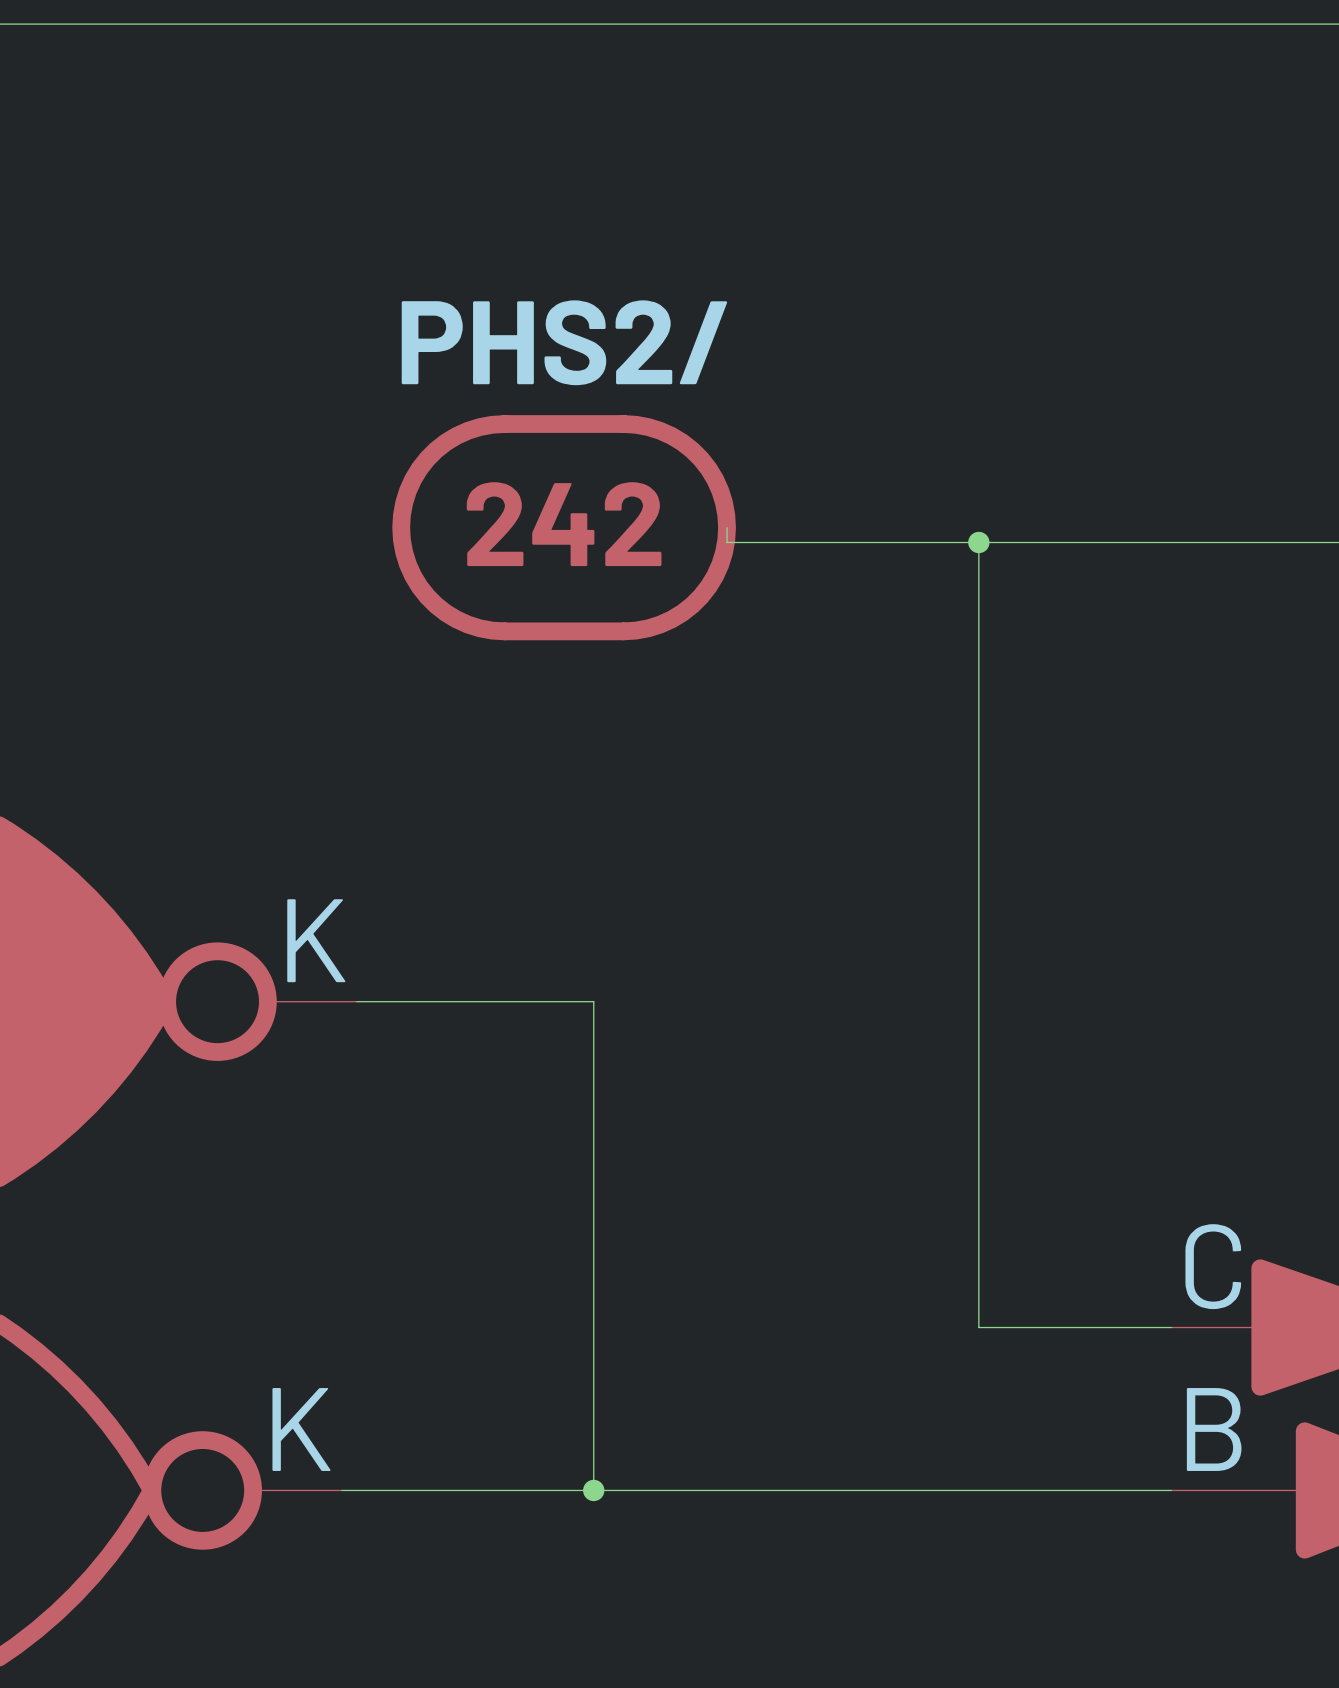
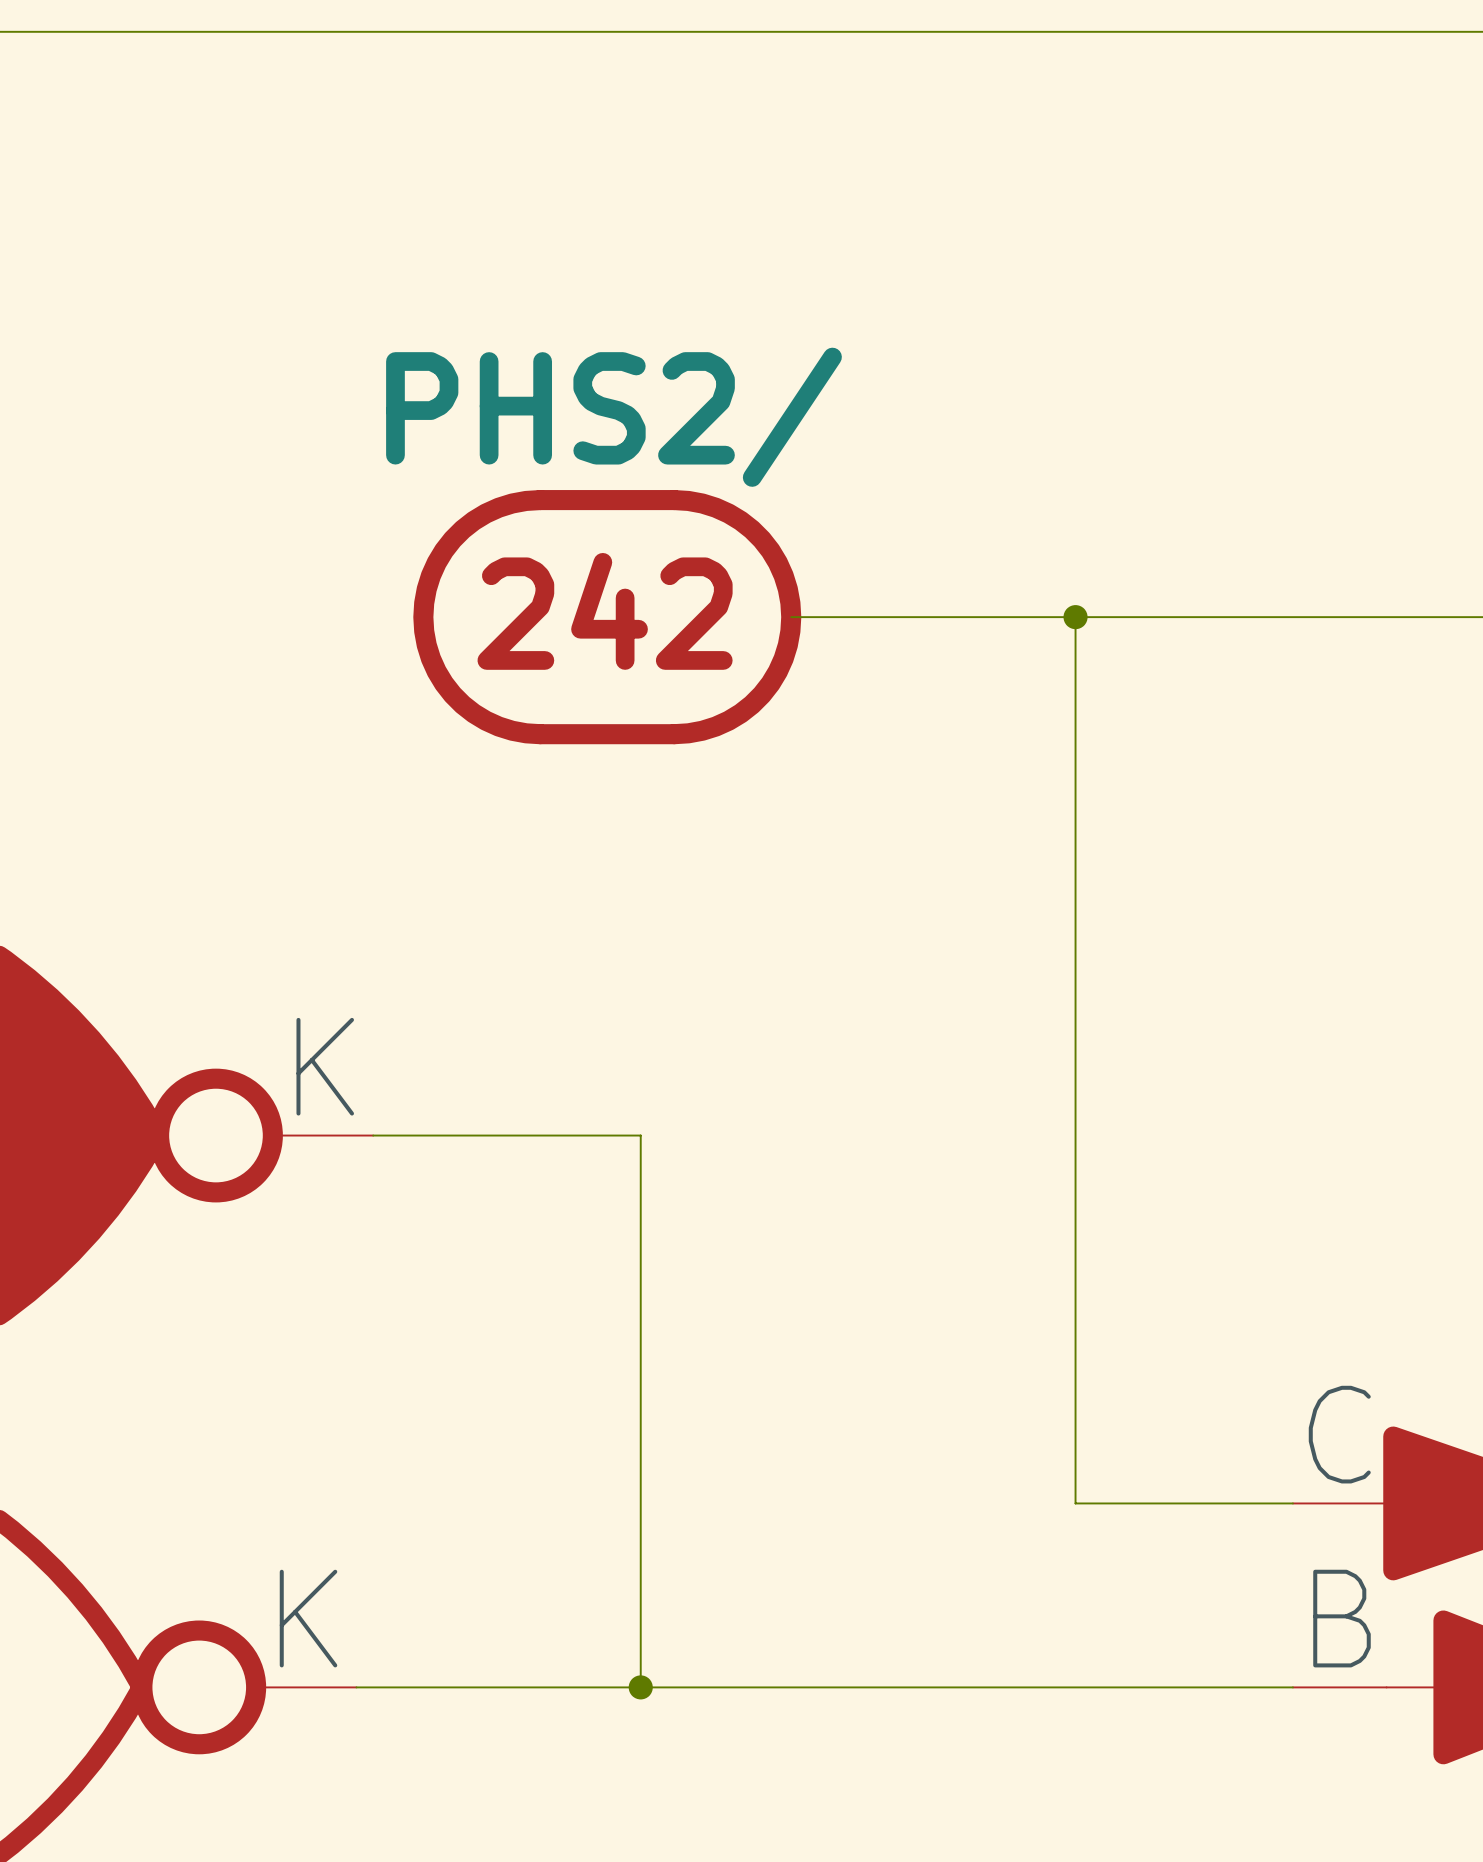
part position: (564, 527) -> (607, 617)

